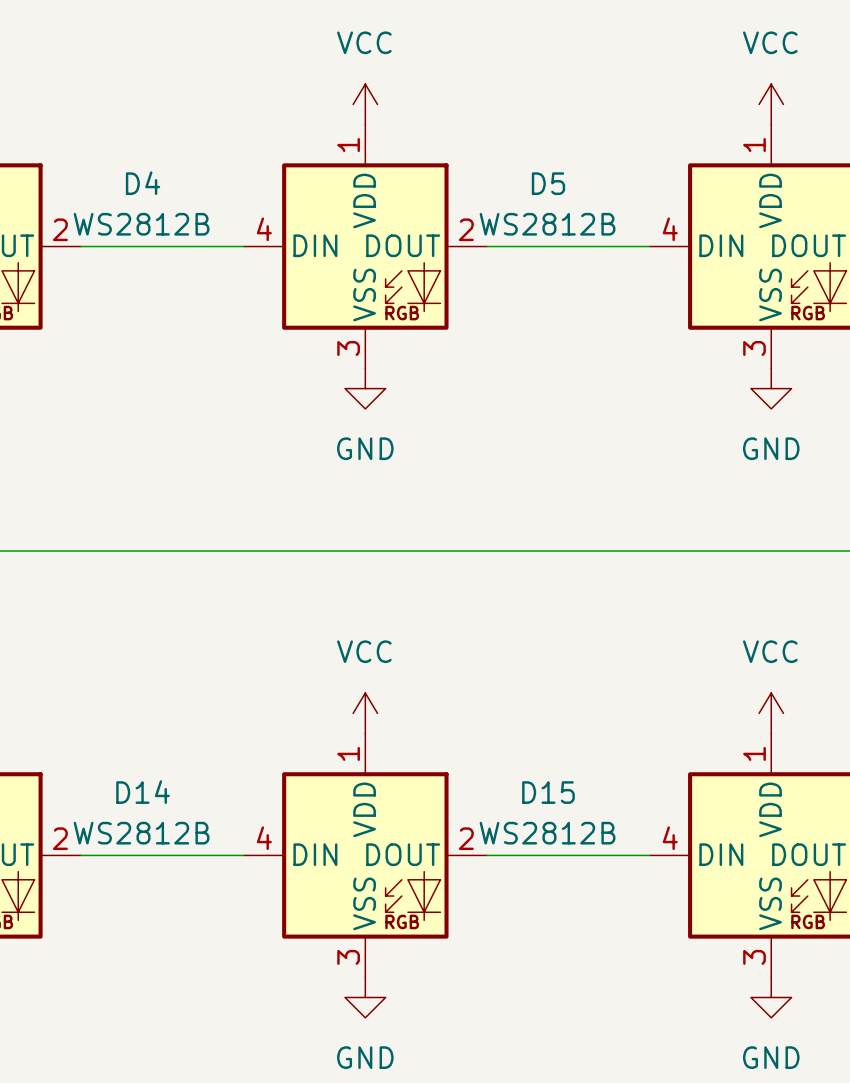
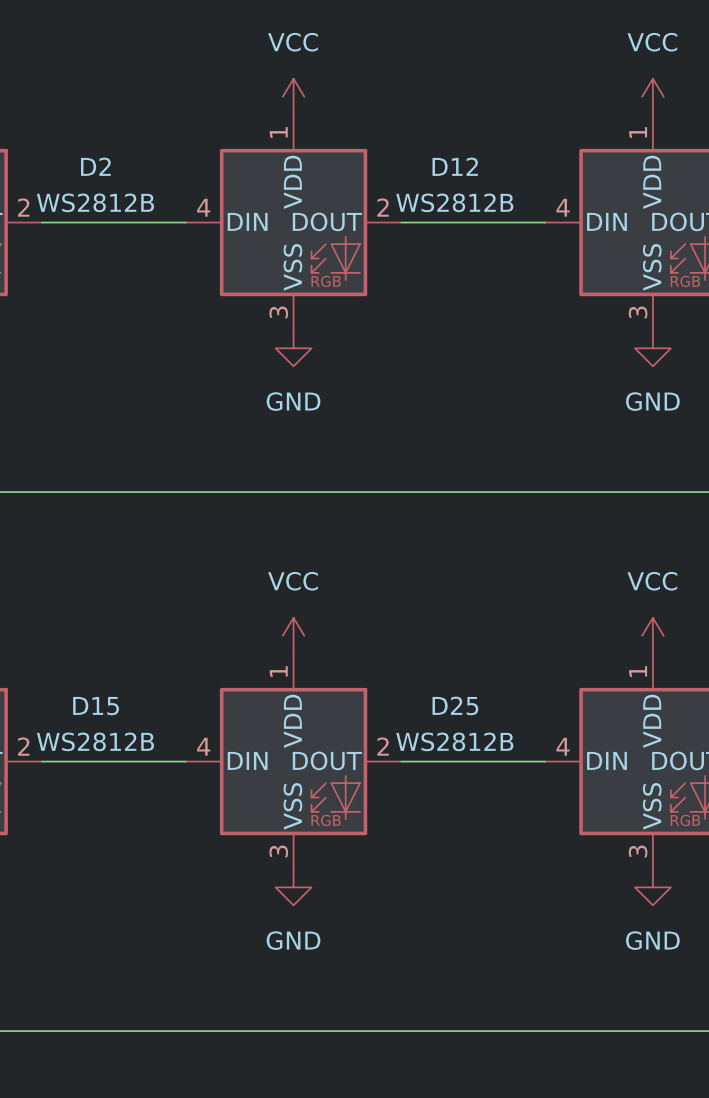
D4 name: D4 (143, 183) -> D2 (95, 166)
D5 name: D5 (548, 183) -> D12 (455, 166)
D14 name: D14 (143, 792) -> D15 (96, 706)
D15 name: D15 (548, 792) -> D25 (455, 705)

